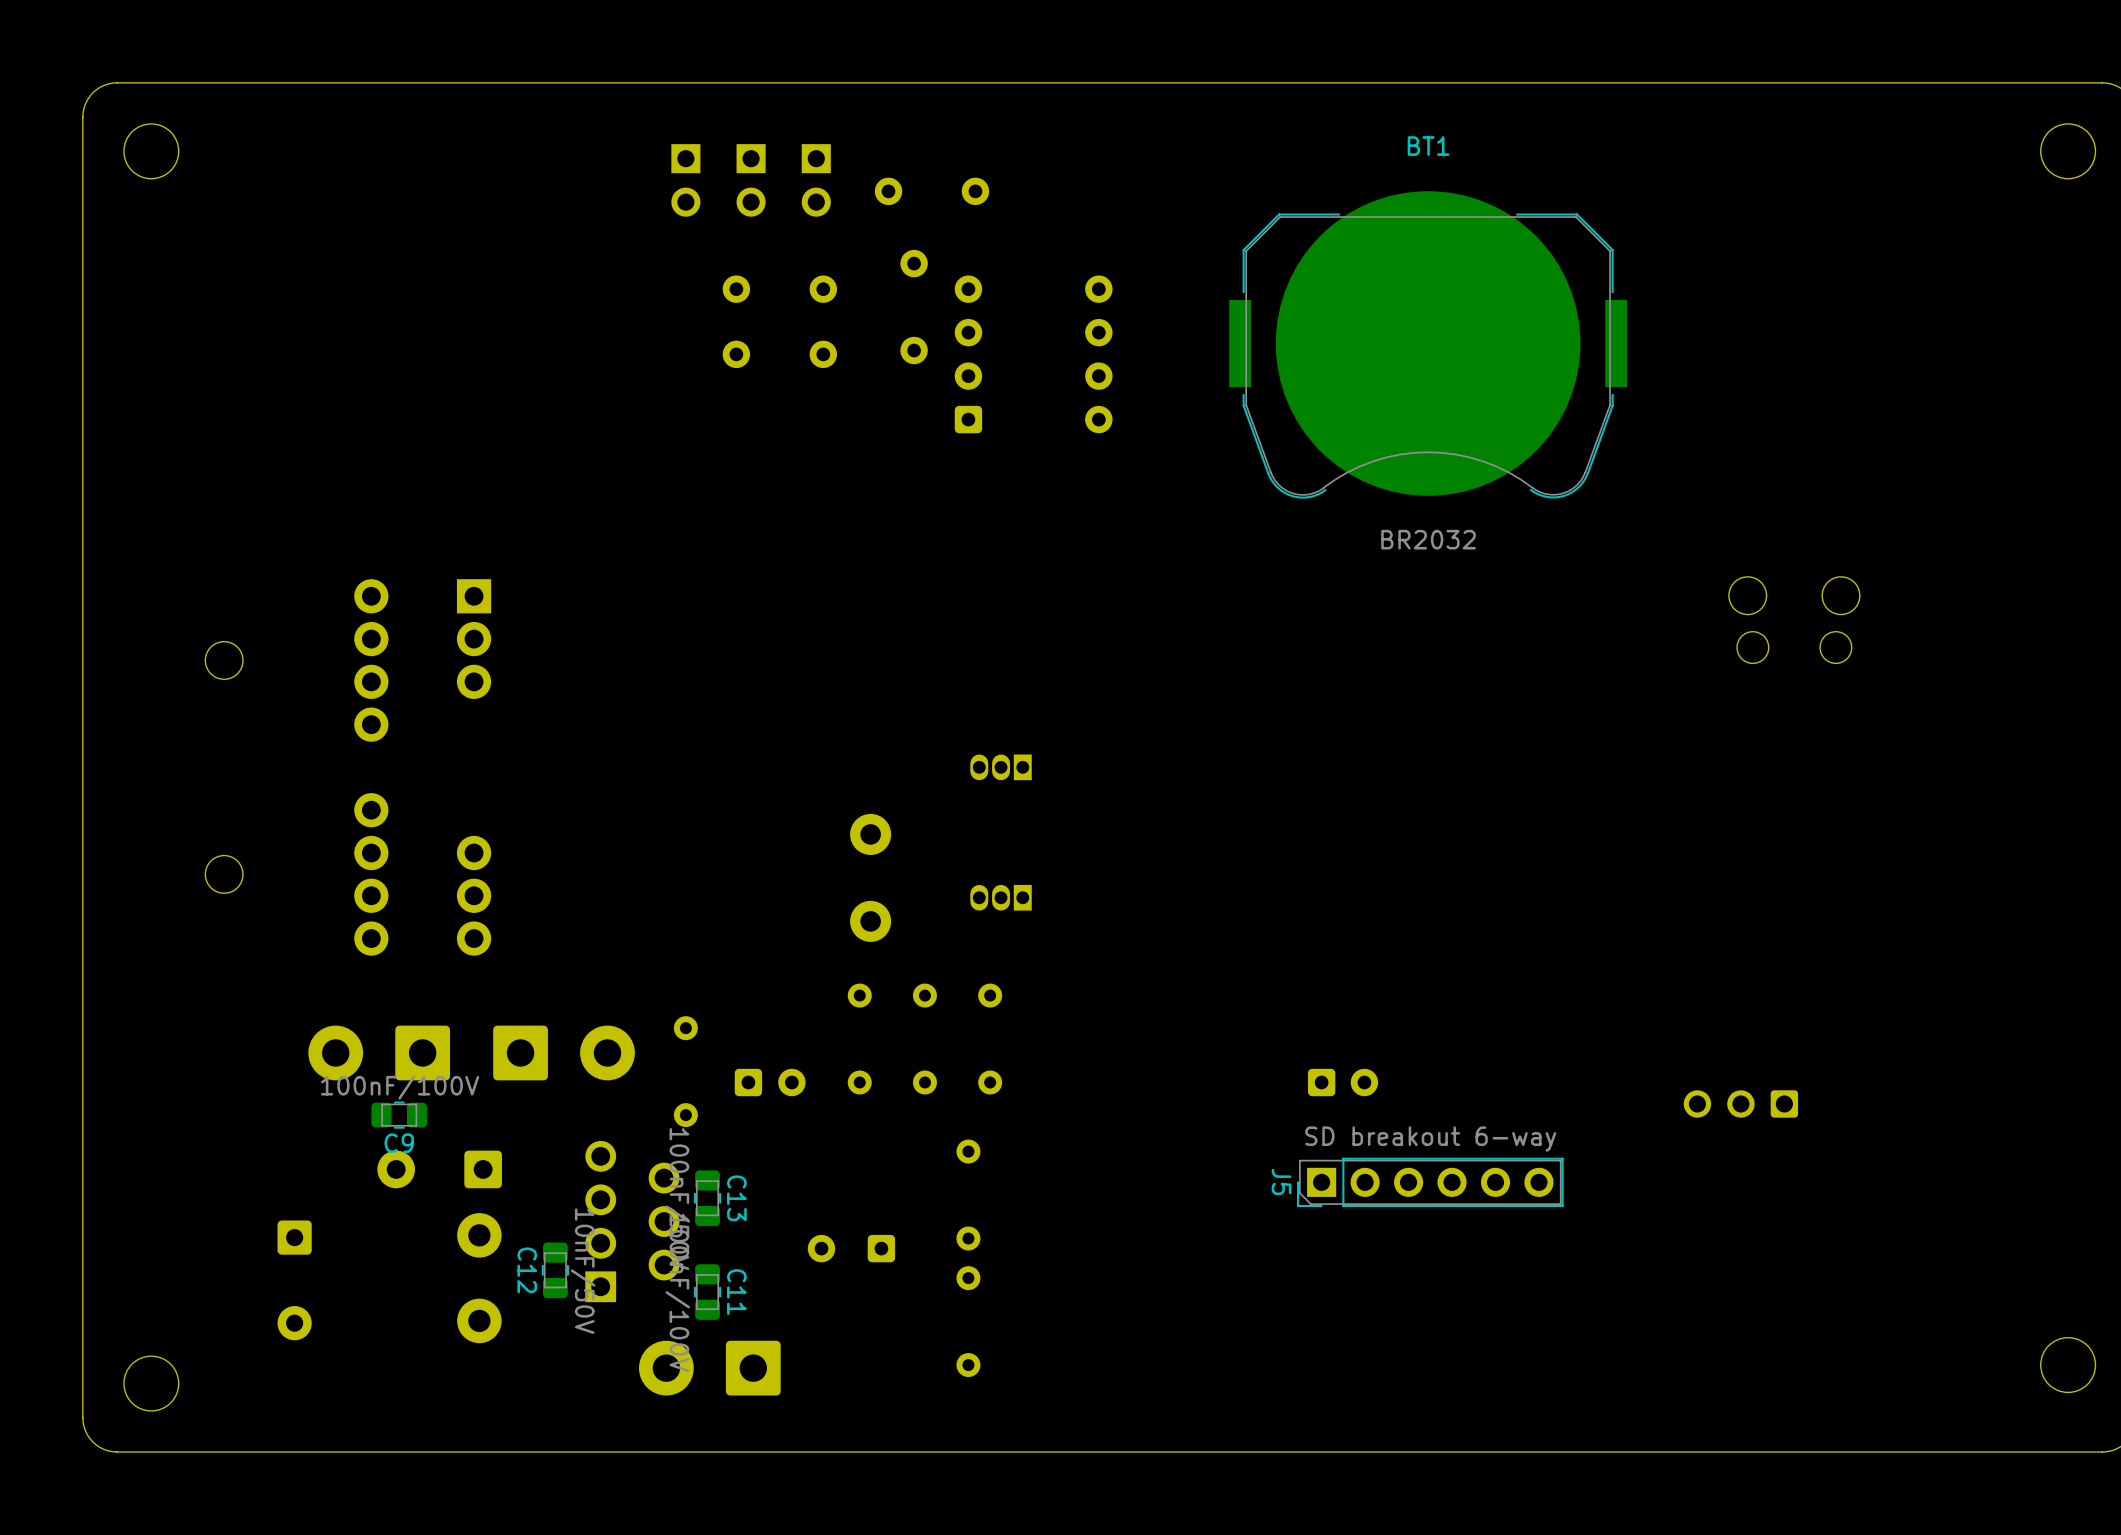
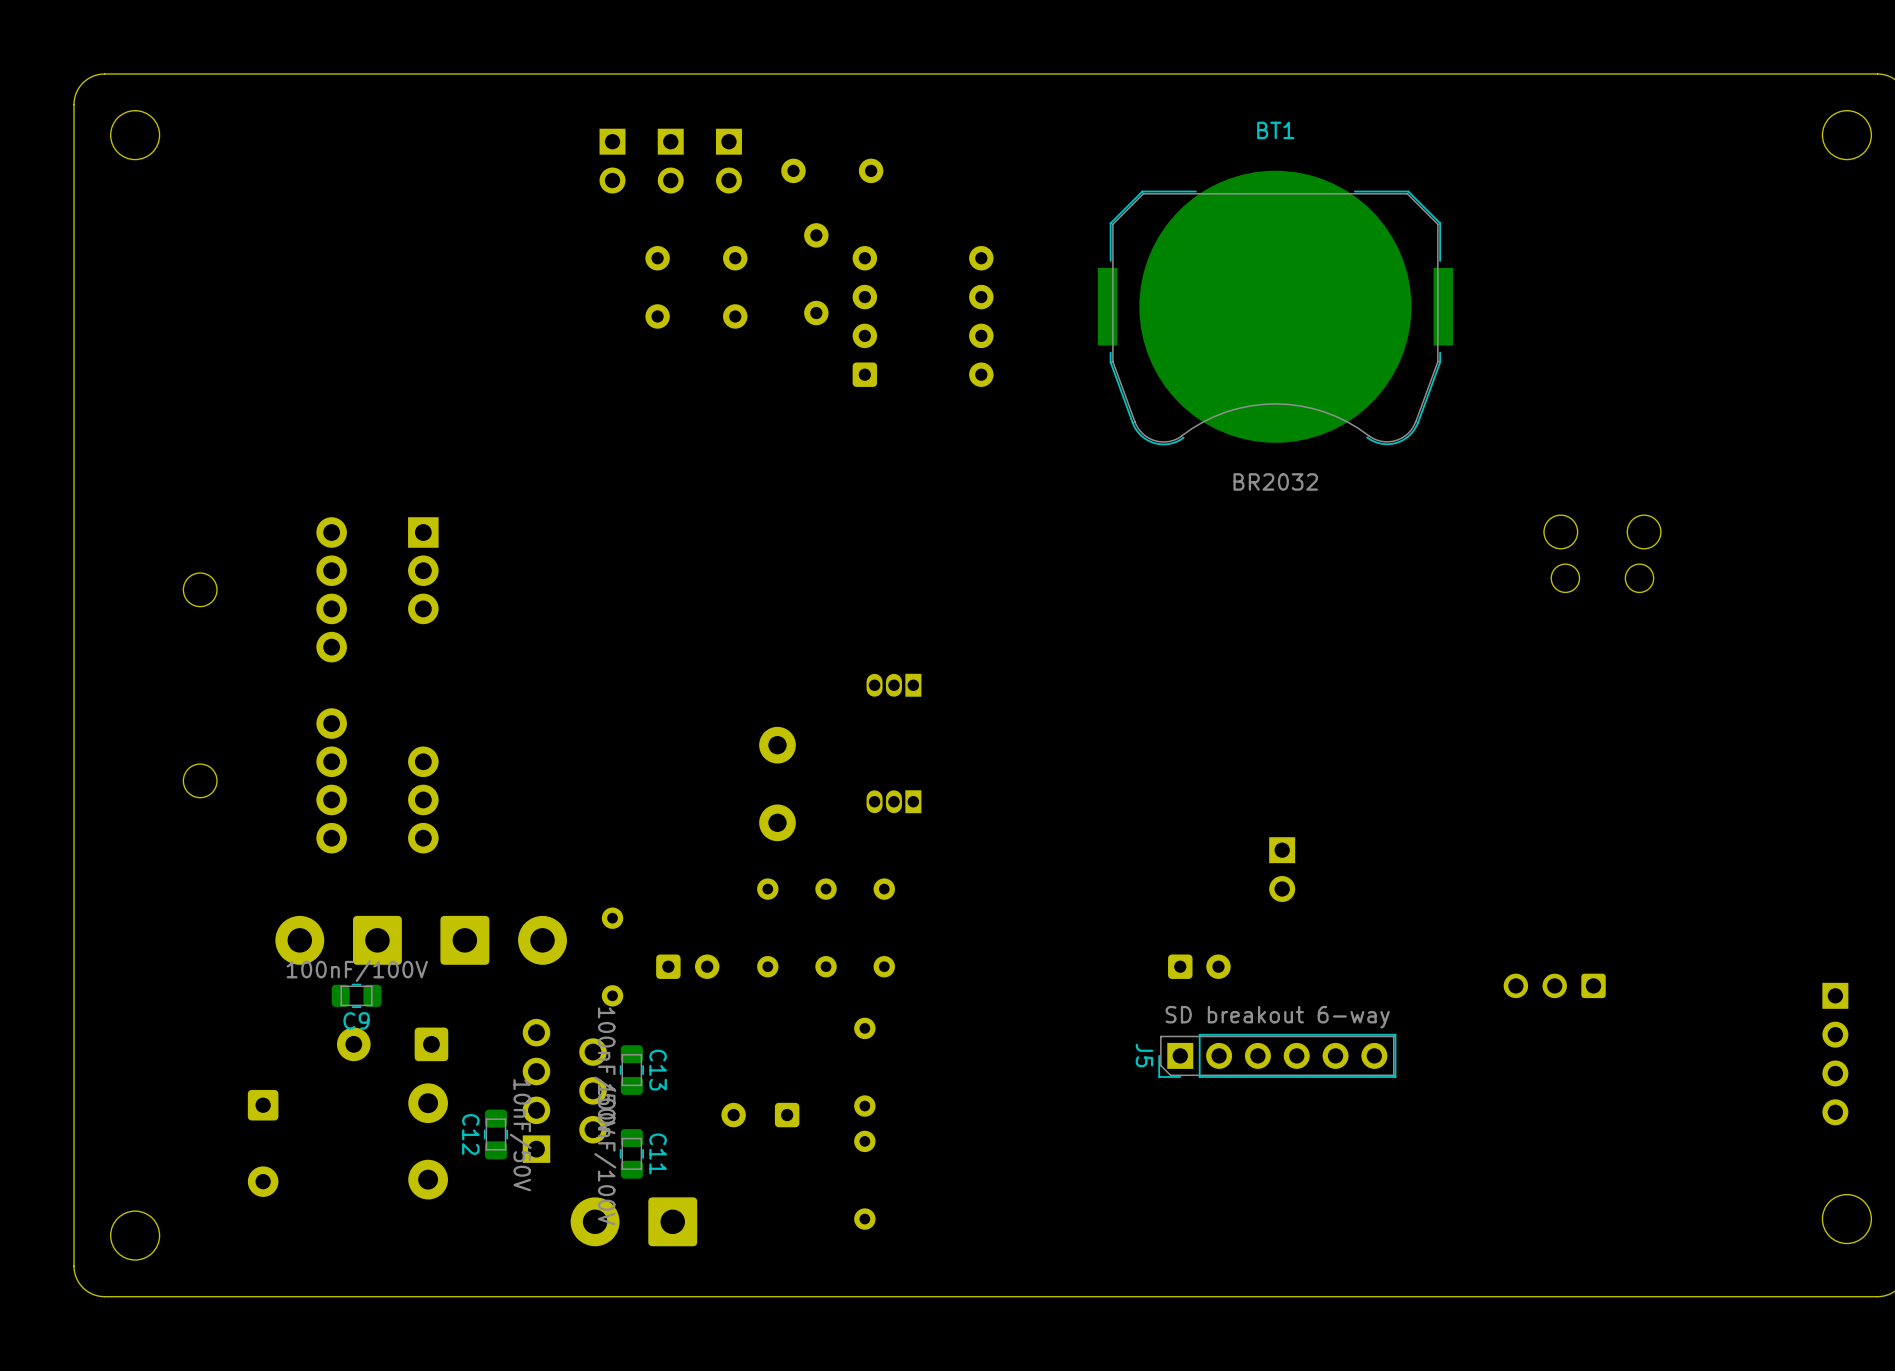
part: none -> (1282, 869)
part: none -> (1835, 1054)

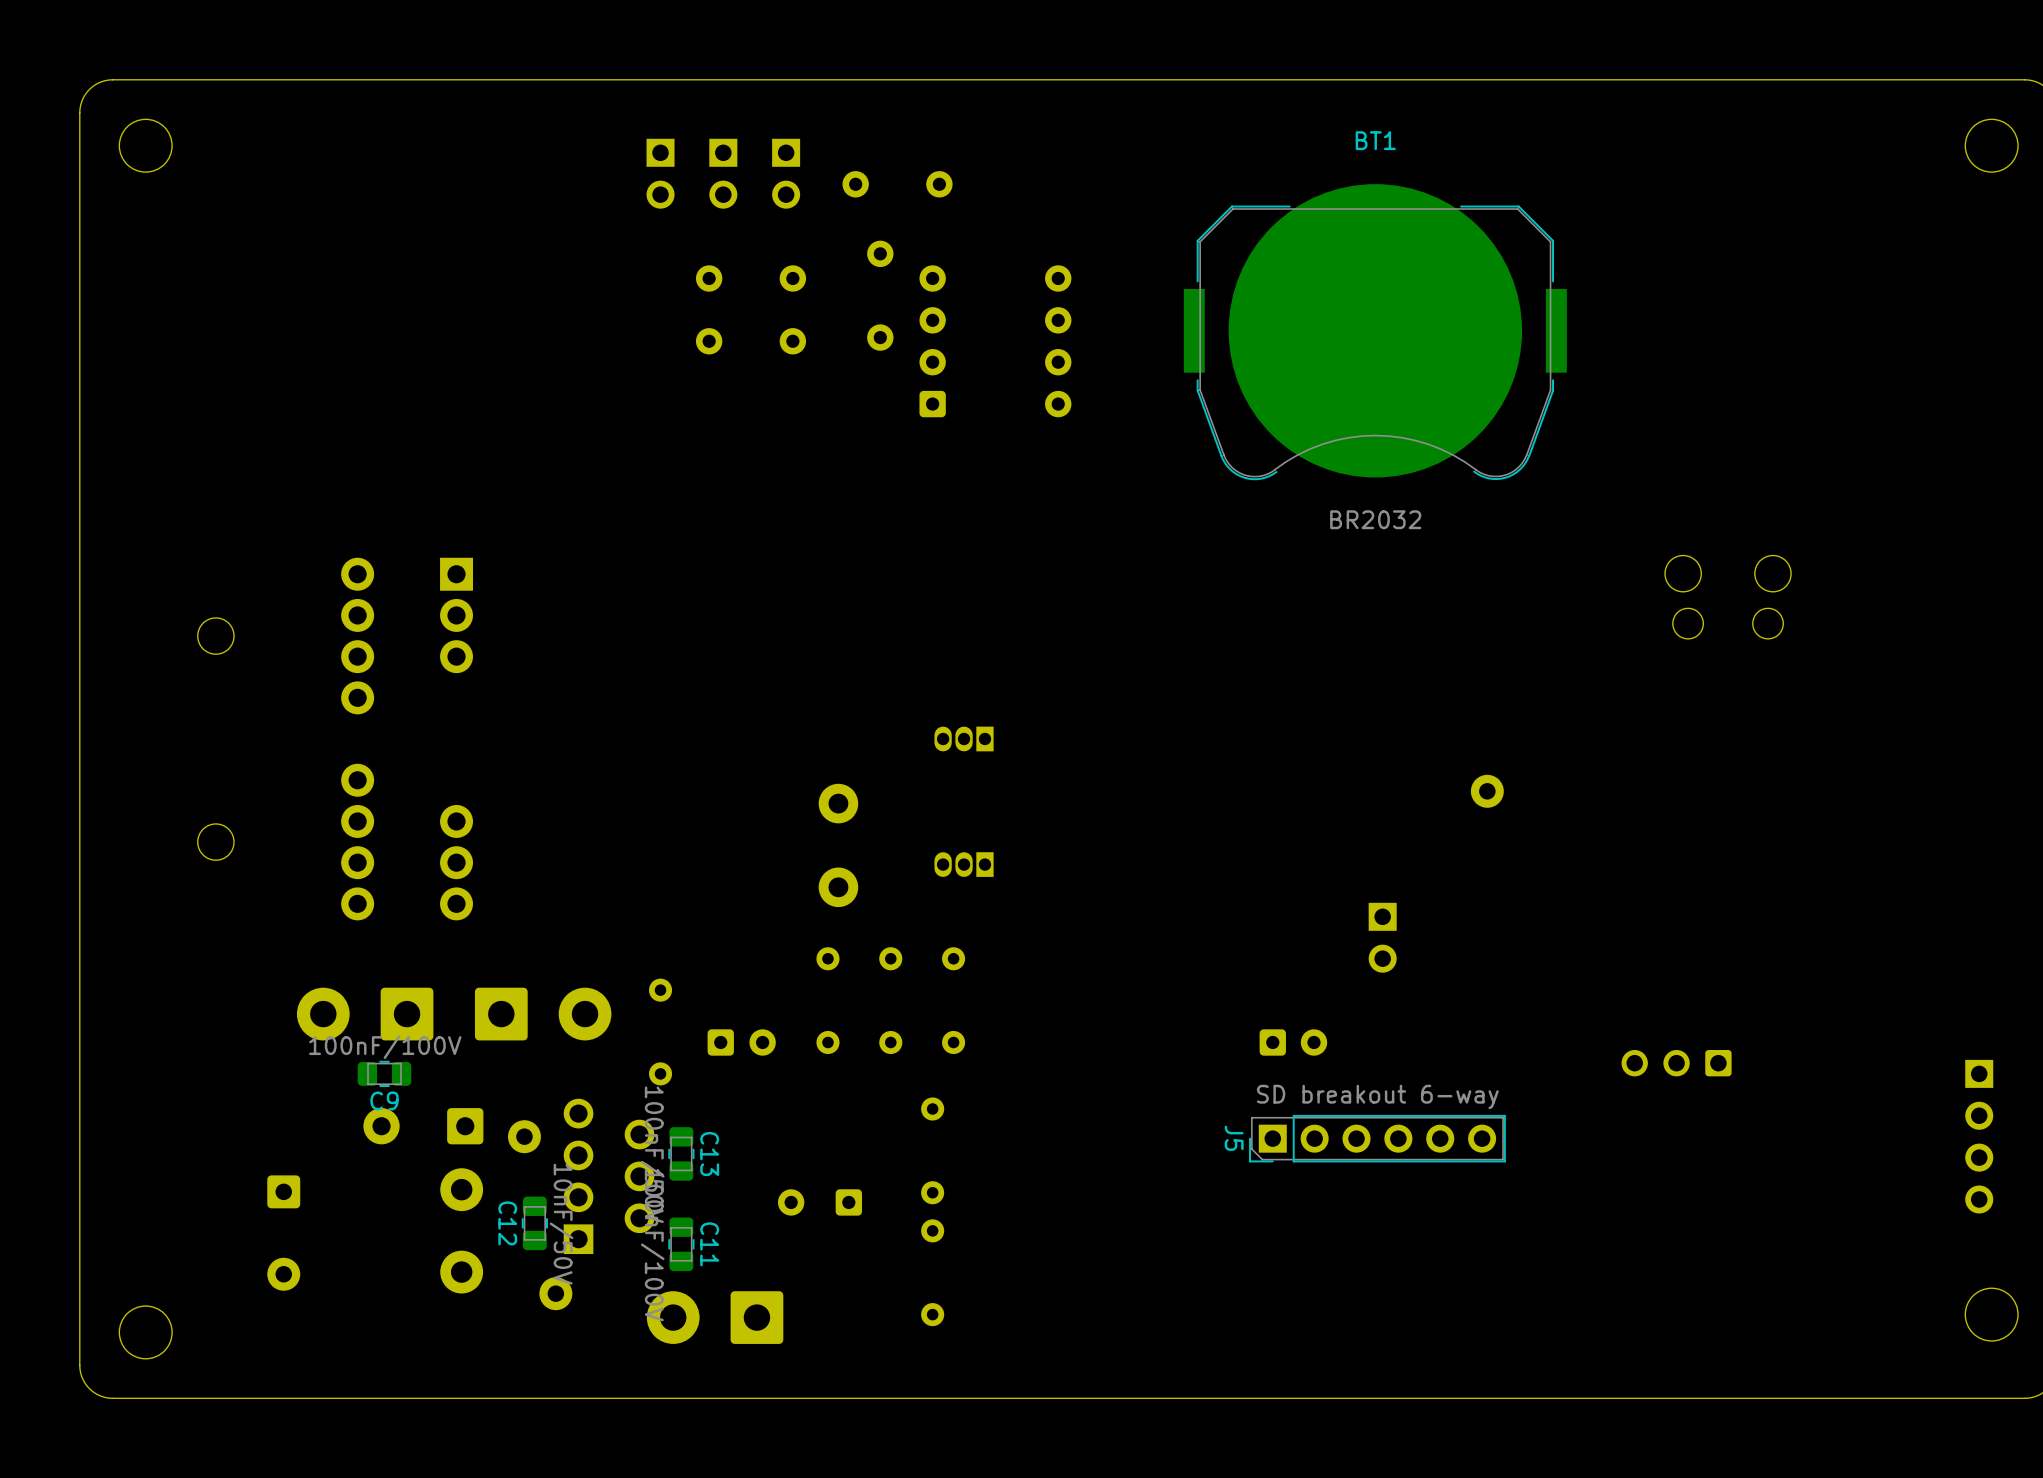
part: none -> (1487, 791)
part: none -> (524, 1136)
part: none -> (555, 1293)
part position: (633, 1221) -> (715, 1317)

